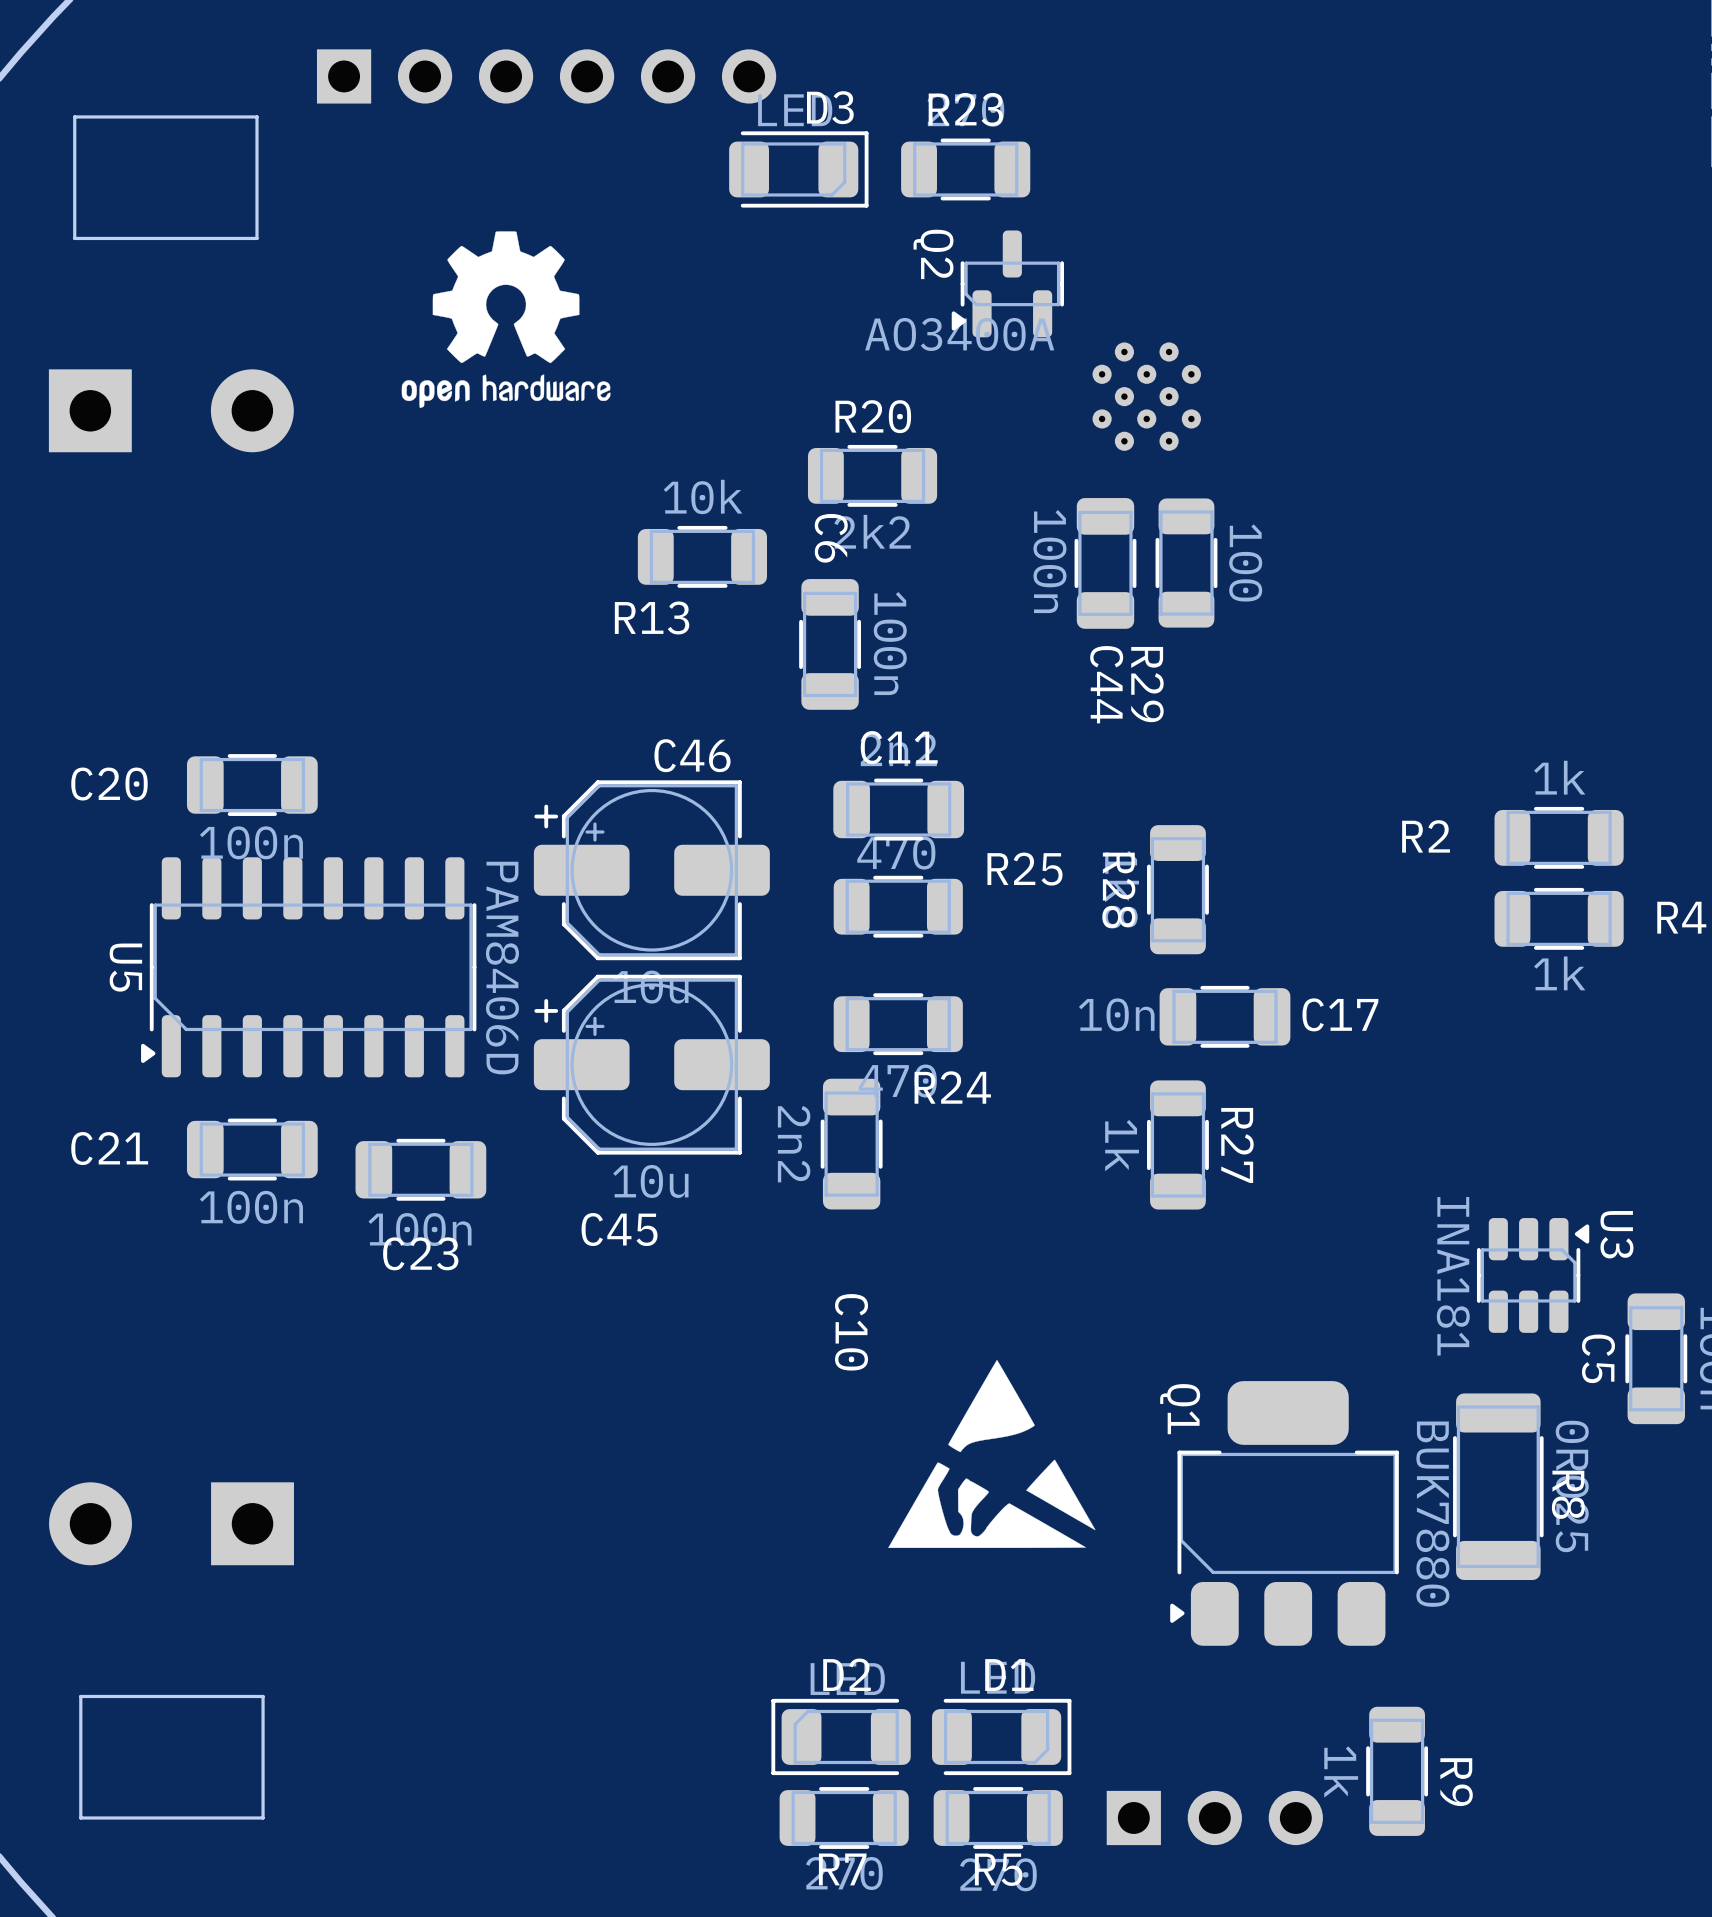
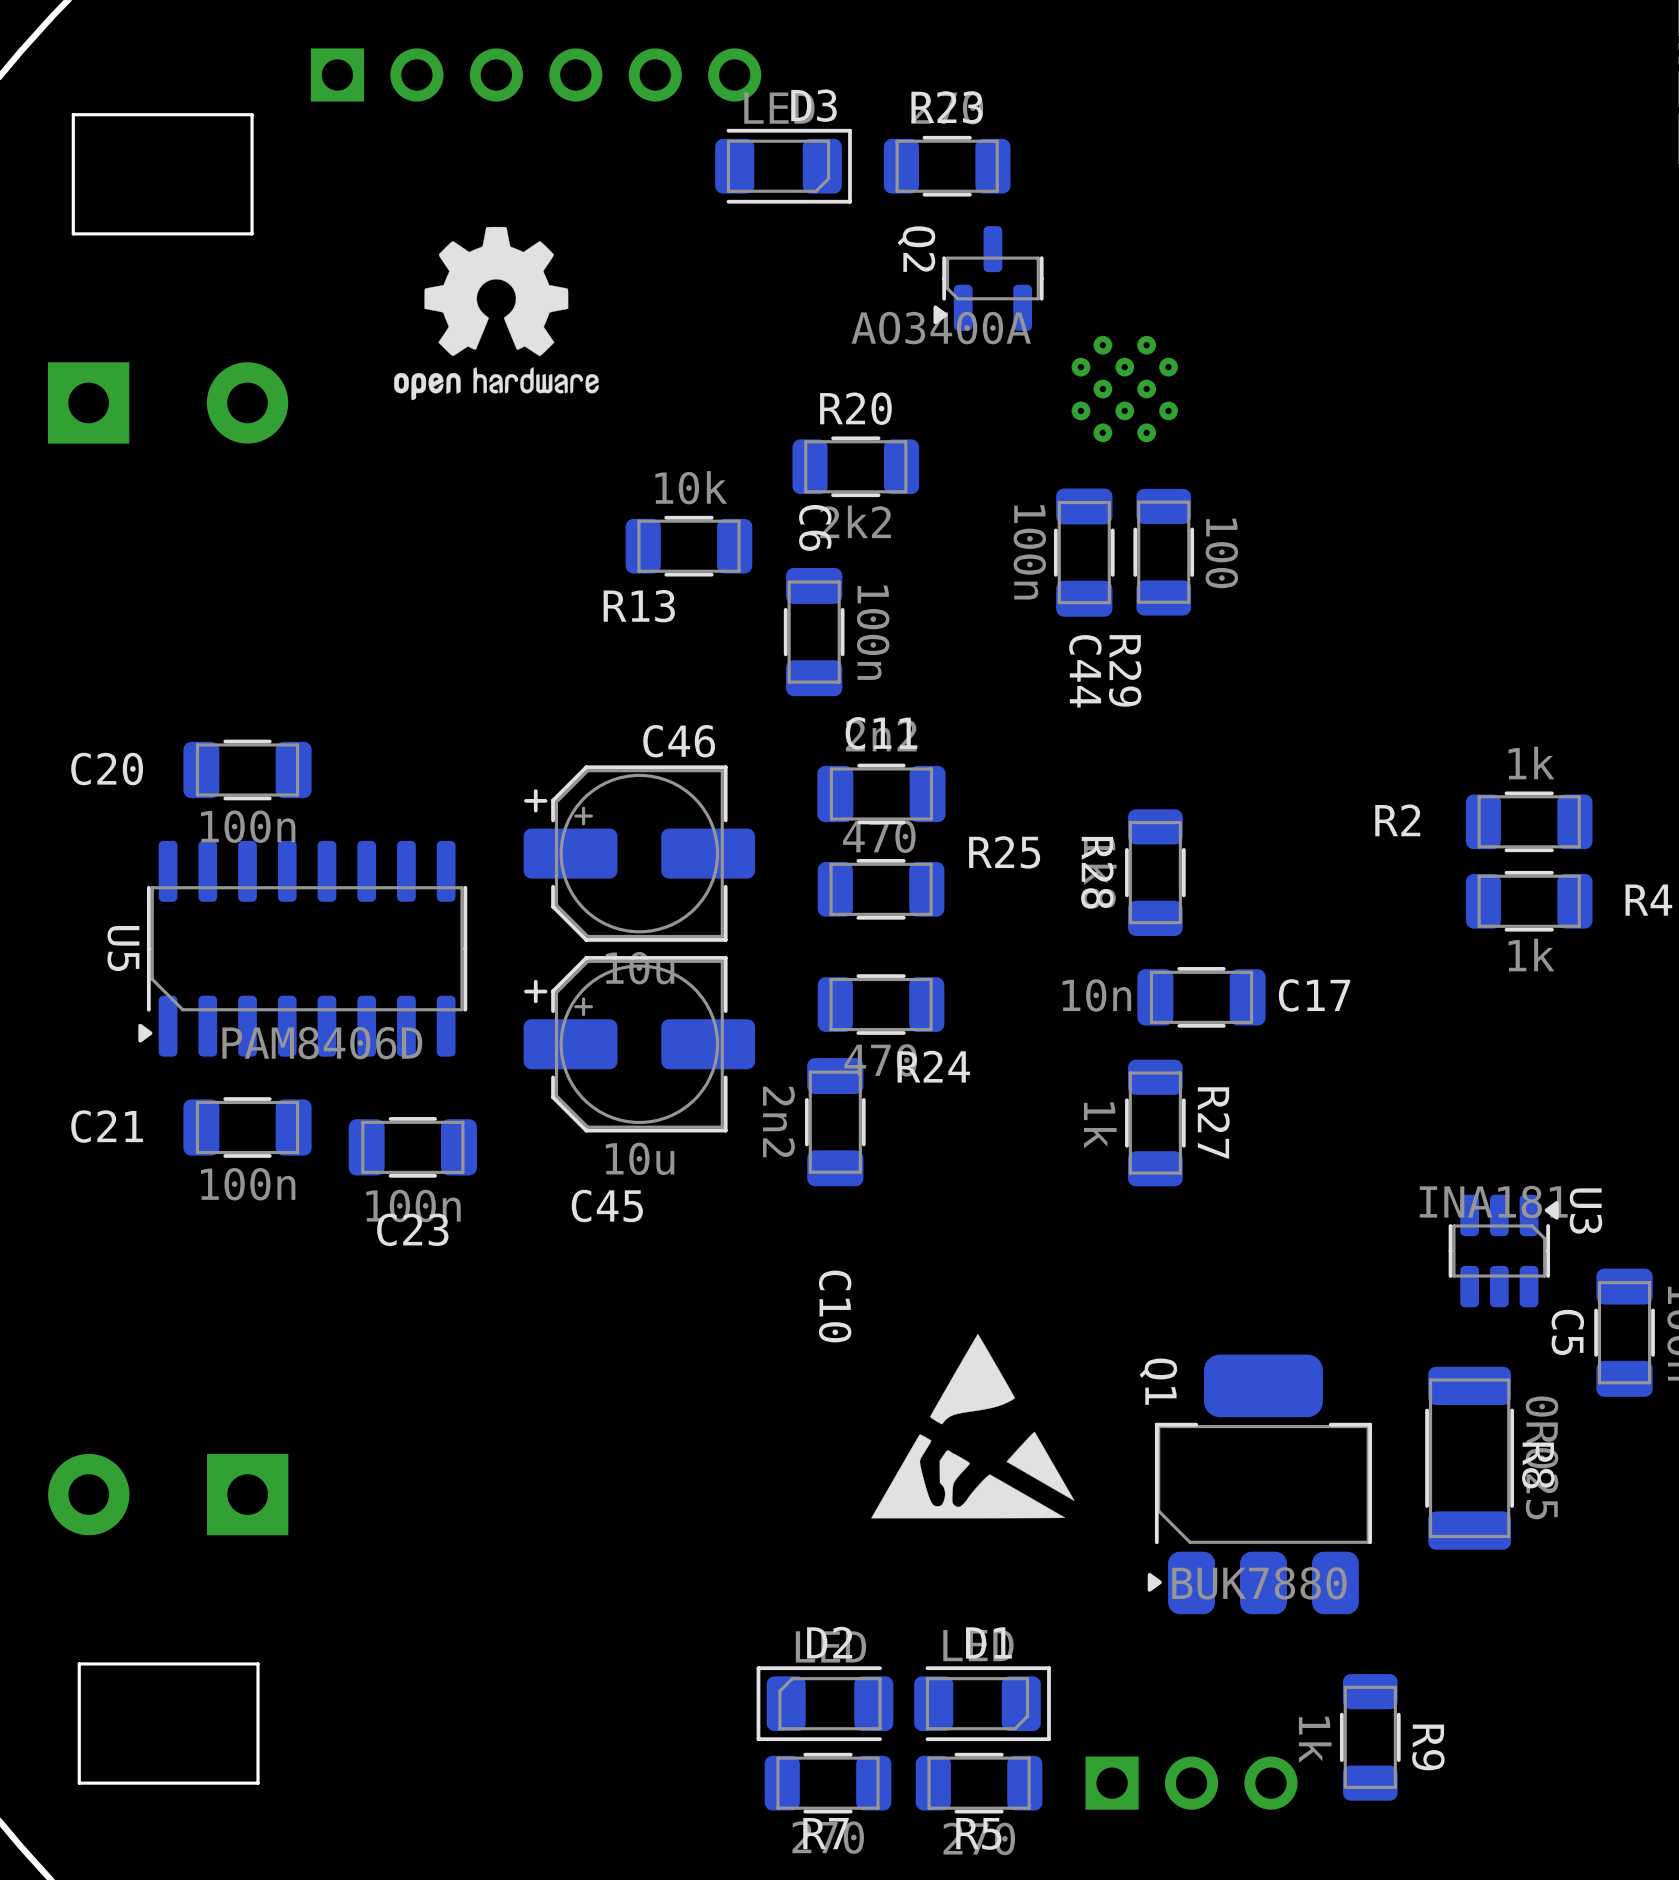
U5 value rotation: 0° (502, 968) -> 90° counterclockwise (322, 1043)
U3 value rotation: 0° (1453, 1276) -> 90° counterclockwise (1493, 1202)
Q1 value rotation: 0° (1432, 1514) -> 90° counterclockwise (1259, 1583)

